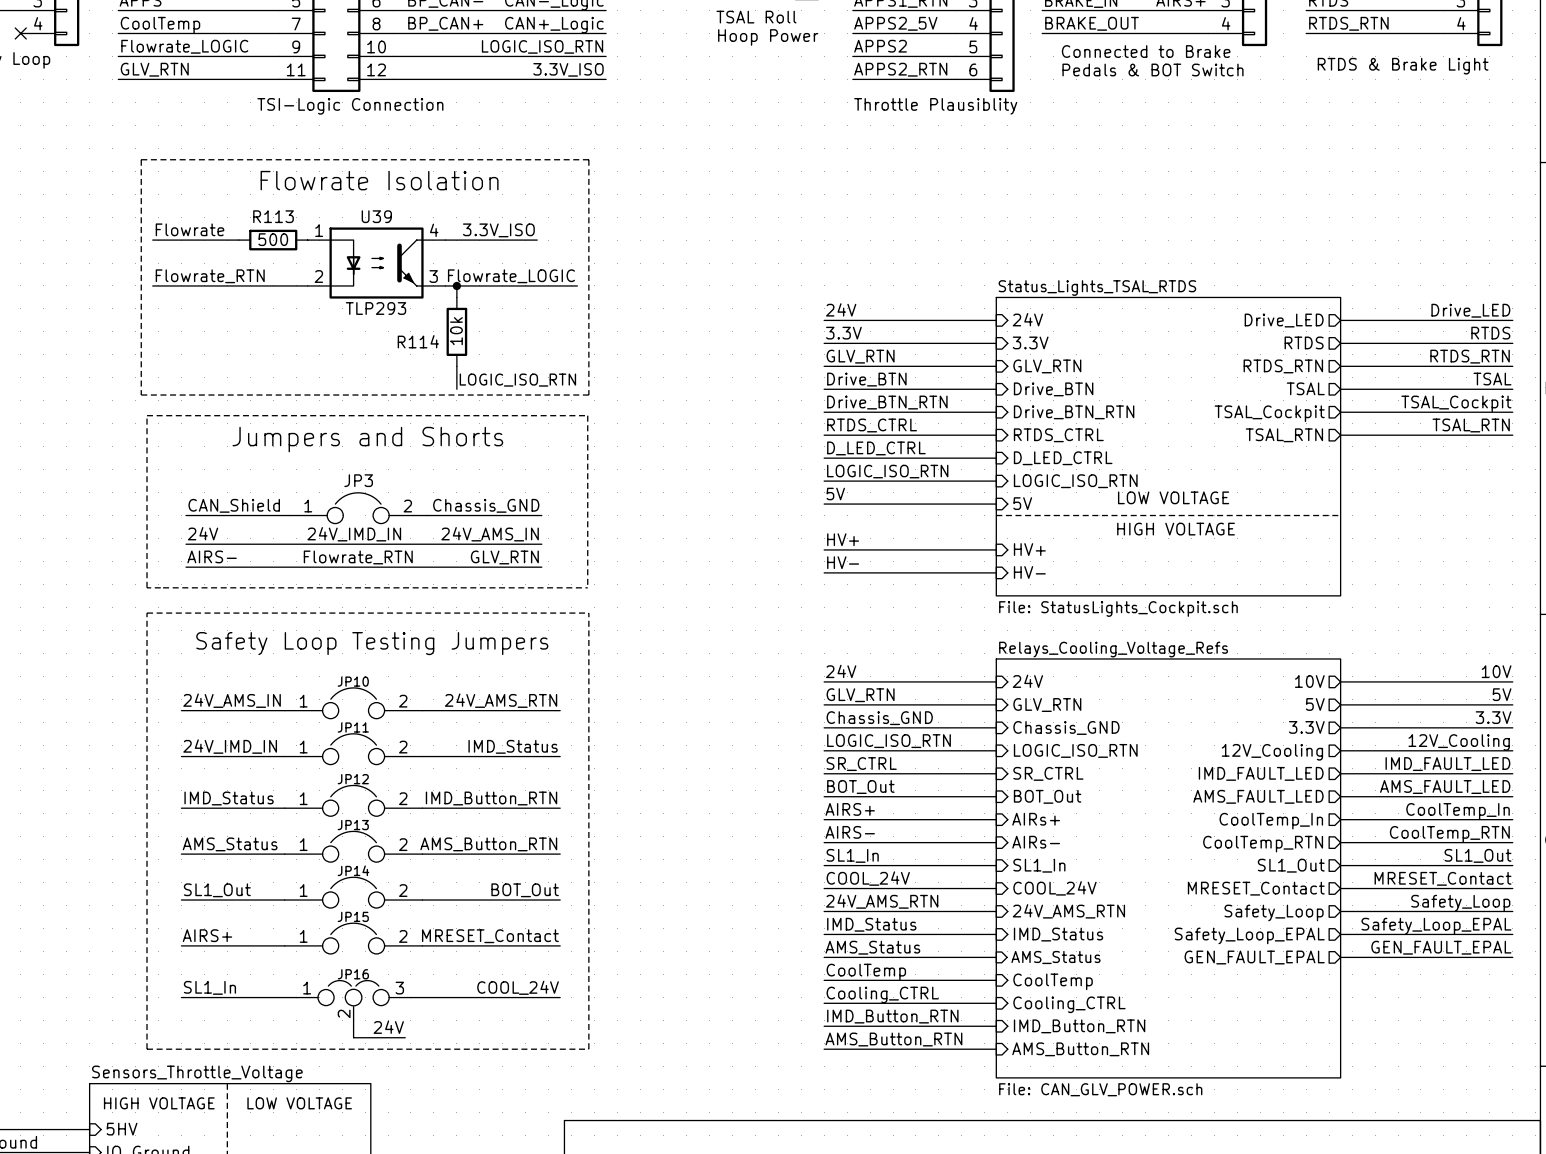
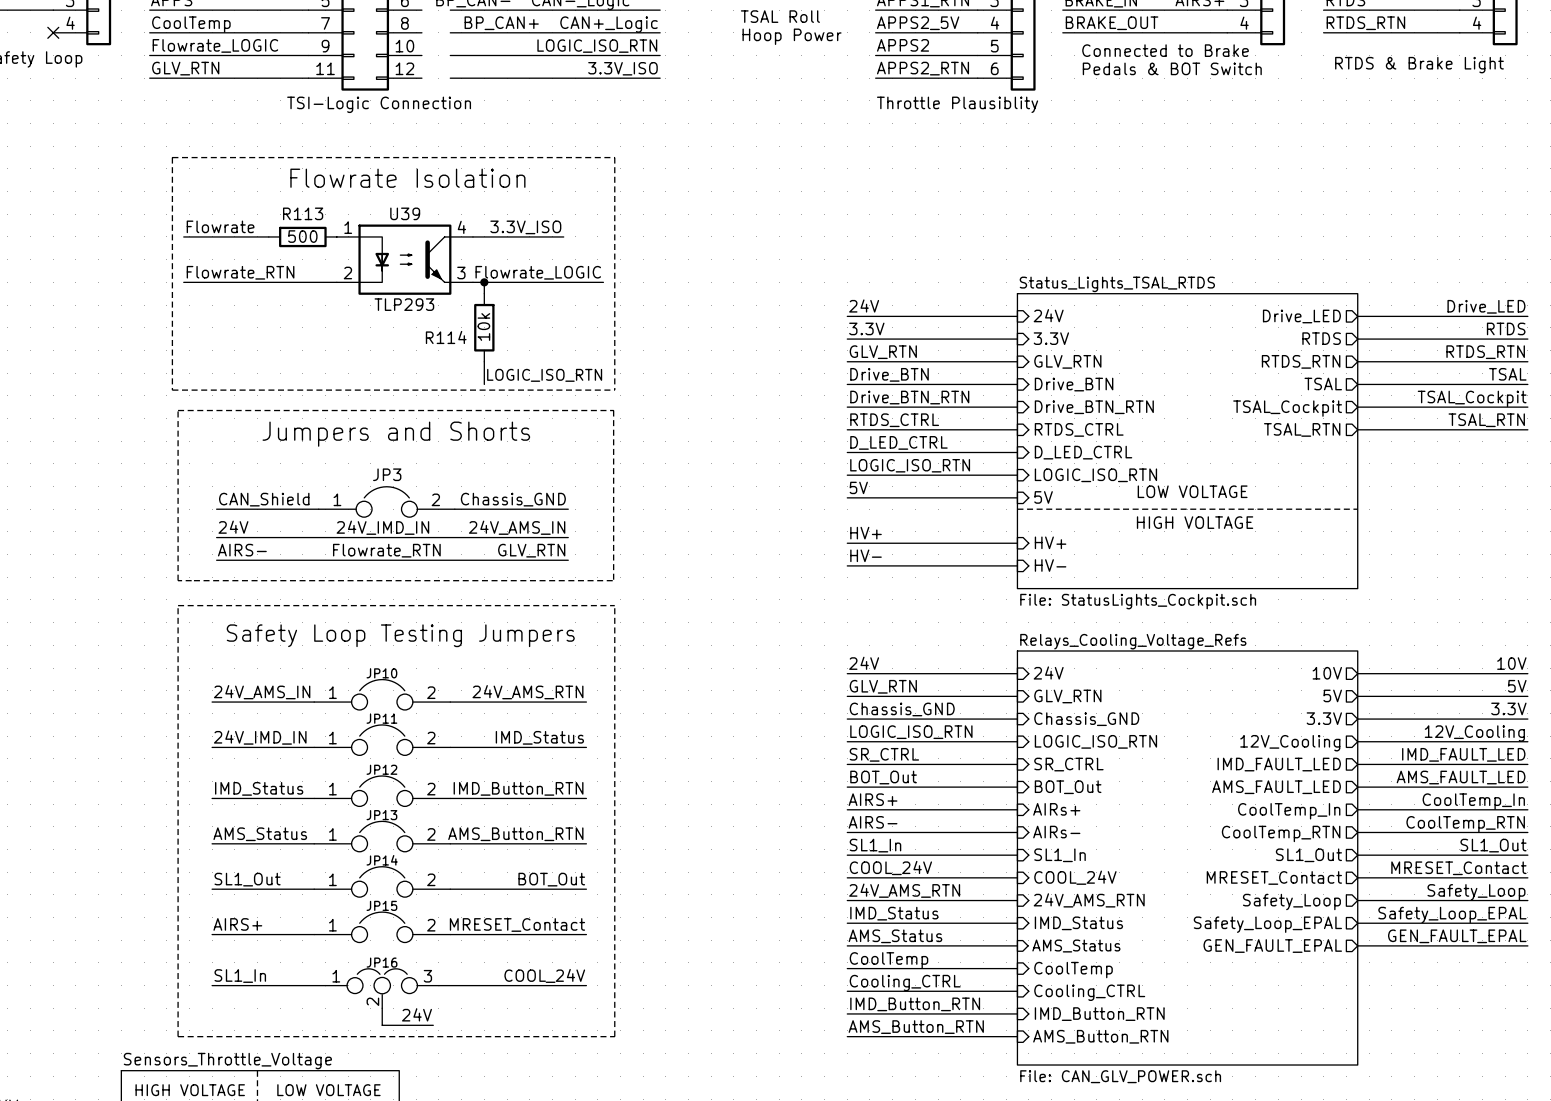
wire: (393, 10) (422, 10) -> (631, 10) (660, 10)
label position: BP_CAN+ (445, 23) -> BP_CAN+ (501, 23)
label position: CAN+_Logic (554, 25) -> CAN+_Logic (609, 24)
wire: (393, 33) (422, 33) -> (631, 32) (660, 32)
label position: LOGIC_ISO_RTN (542, 46) -> LOGIC_ISO_RTN (597, 46)
wire: (393, 56) (422, 56) -> (631, 55) (660, 55)
label position: 3.3V_ISO (568, 69) -> 3.3V_ISO (622, 68)
wire: (393, 79) (422, 79) -> (631, 78) (660, 78)

